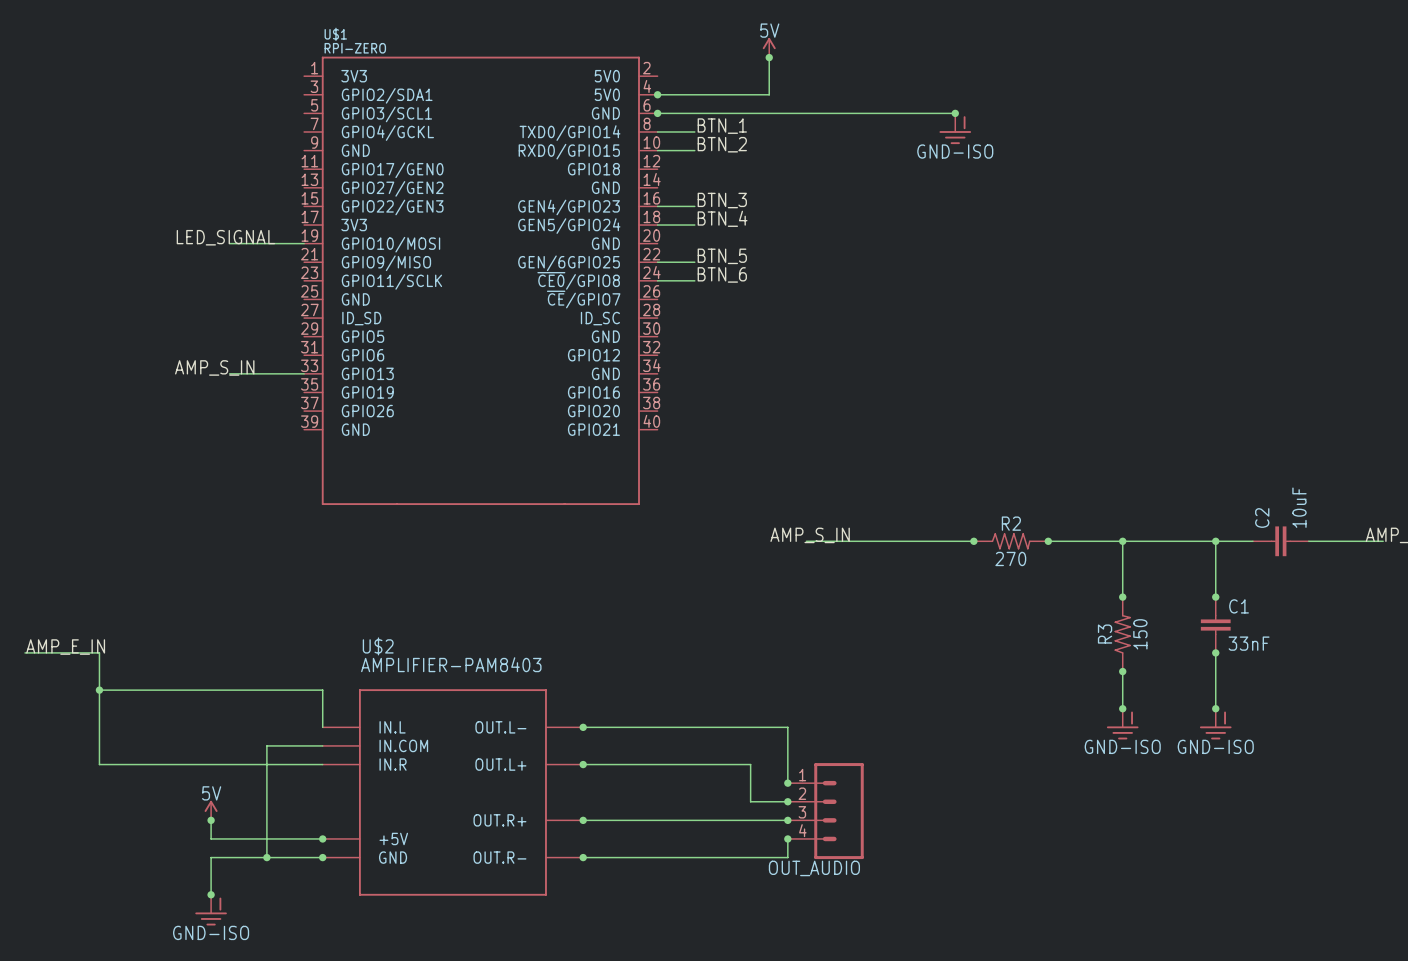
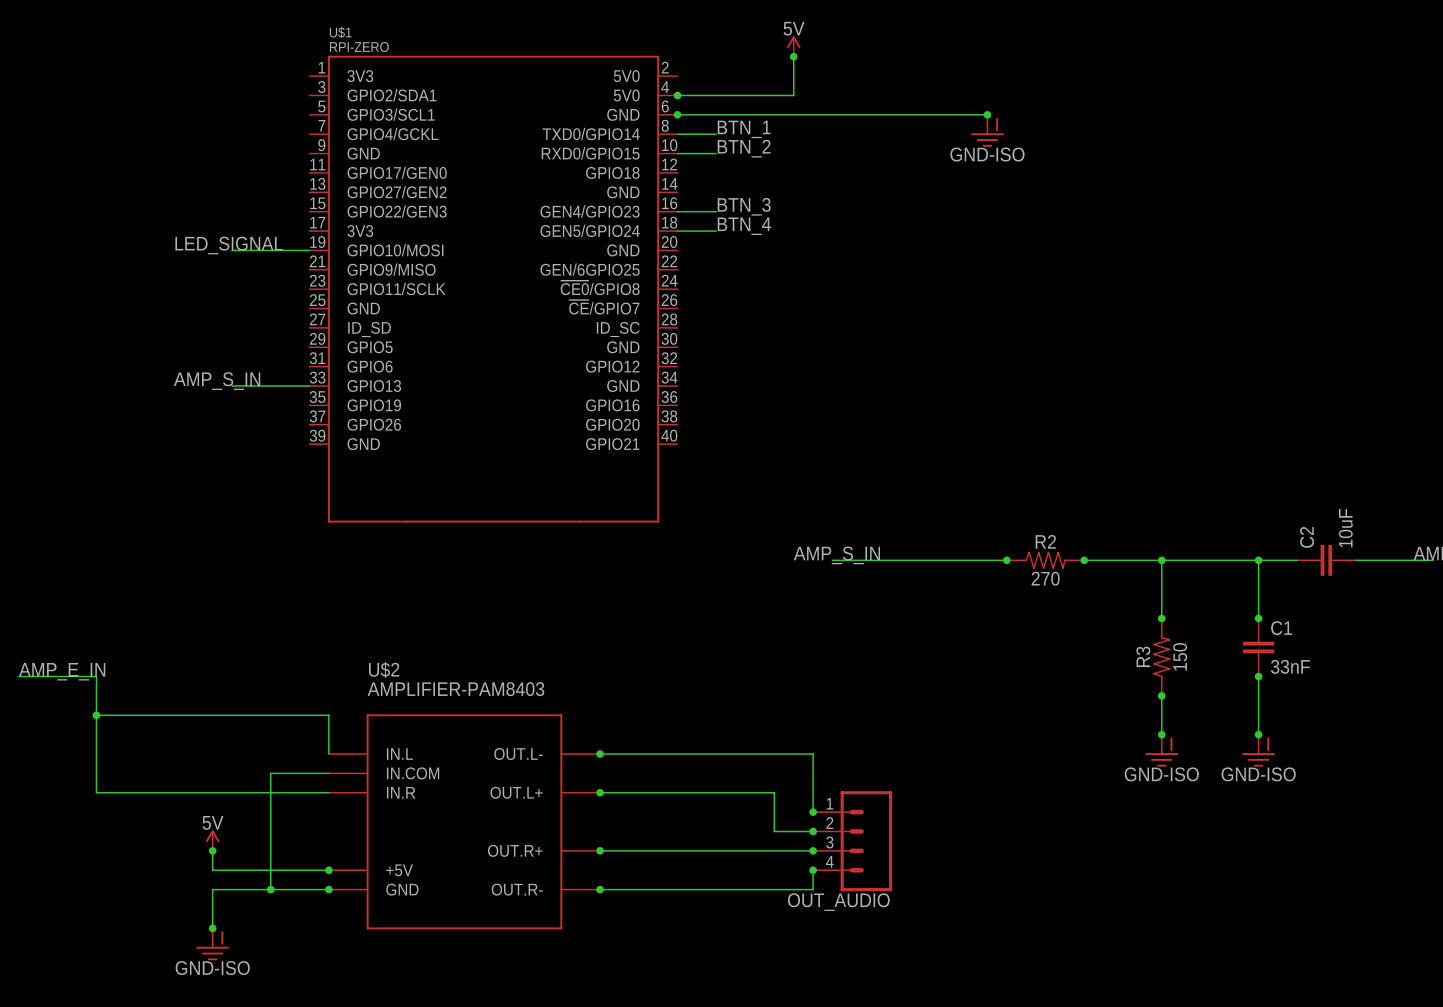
label: BTN_5 (722, 256) -> none
wire: (657, 262) (694, 262) -> none
label: BTN_6 (722, 274) -> none
wire: (657, 280) (694, 280) -> none

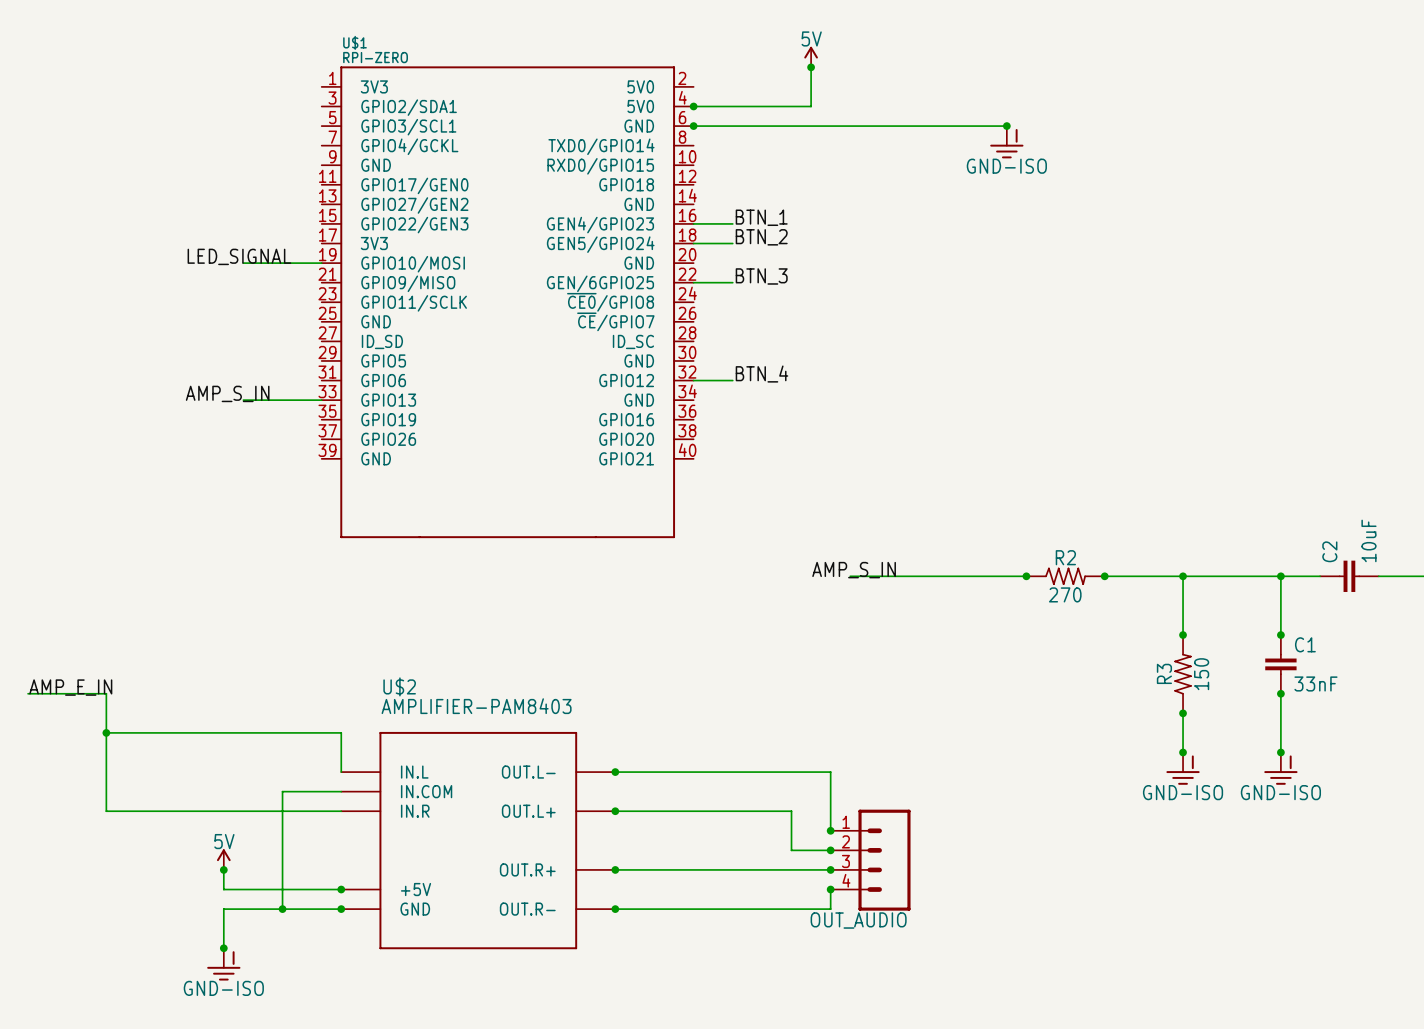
label: BTN_1 (744, 129) -> none
wire: (677, 134) (716, 134) -> none
label: BTN_2 (744, 148) -> none
wire: (677, 153) (716, 153) -> (693, 282) (732, 282)
label: BTN_3 (744, 206) -> BTN_1 (761, 217)
label: BTN_4 (744, 226) -> BTN_2 (761, 237)
label: none -> BTN_3 (761, 276)
label: none -> BTN_4 (761, 374)
wire: none -> (693, 380) (732, 380)

